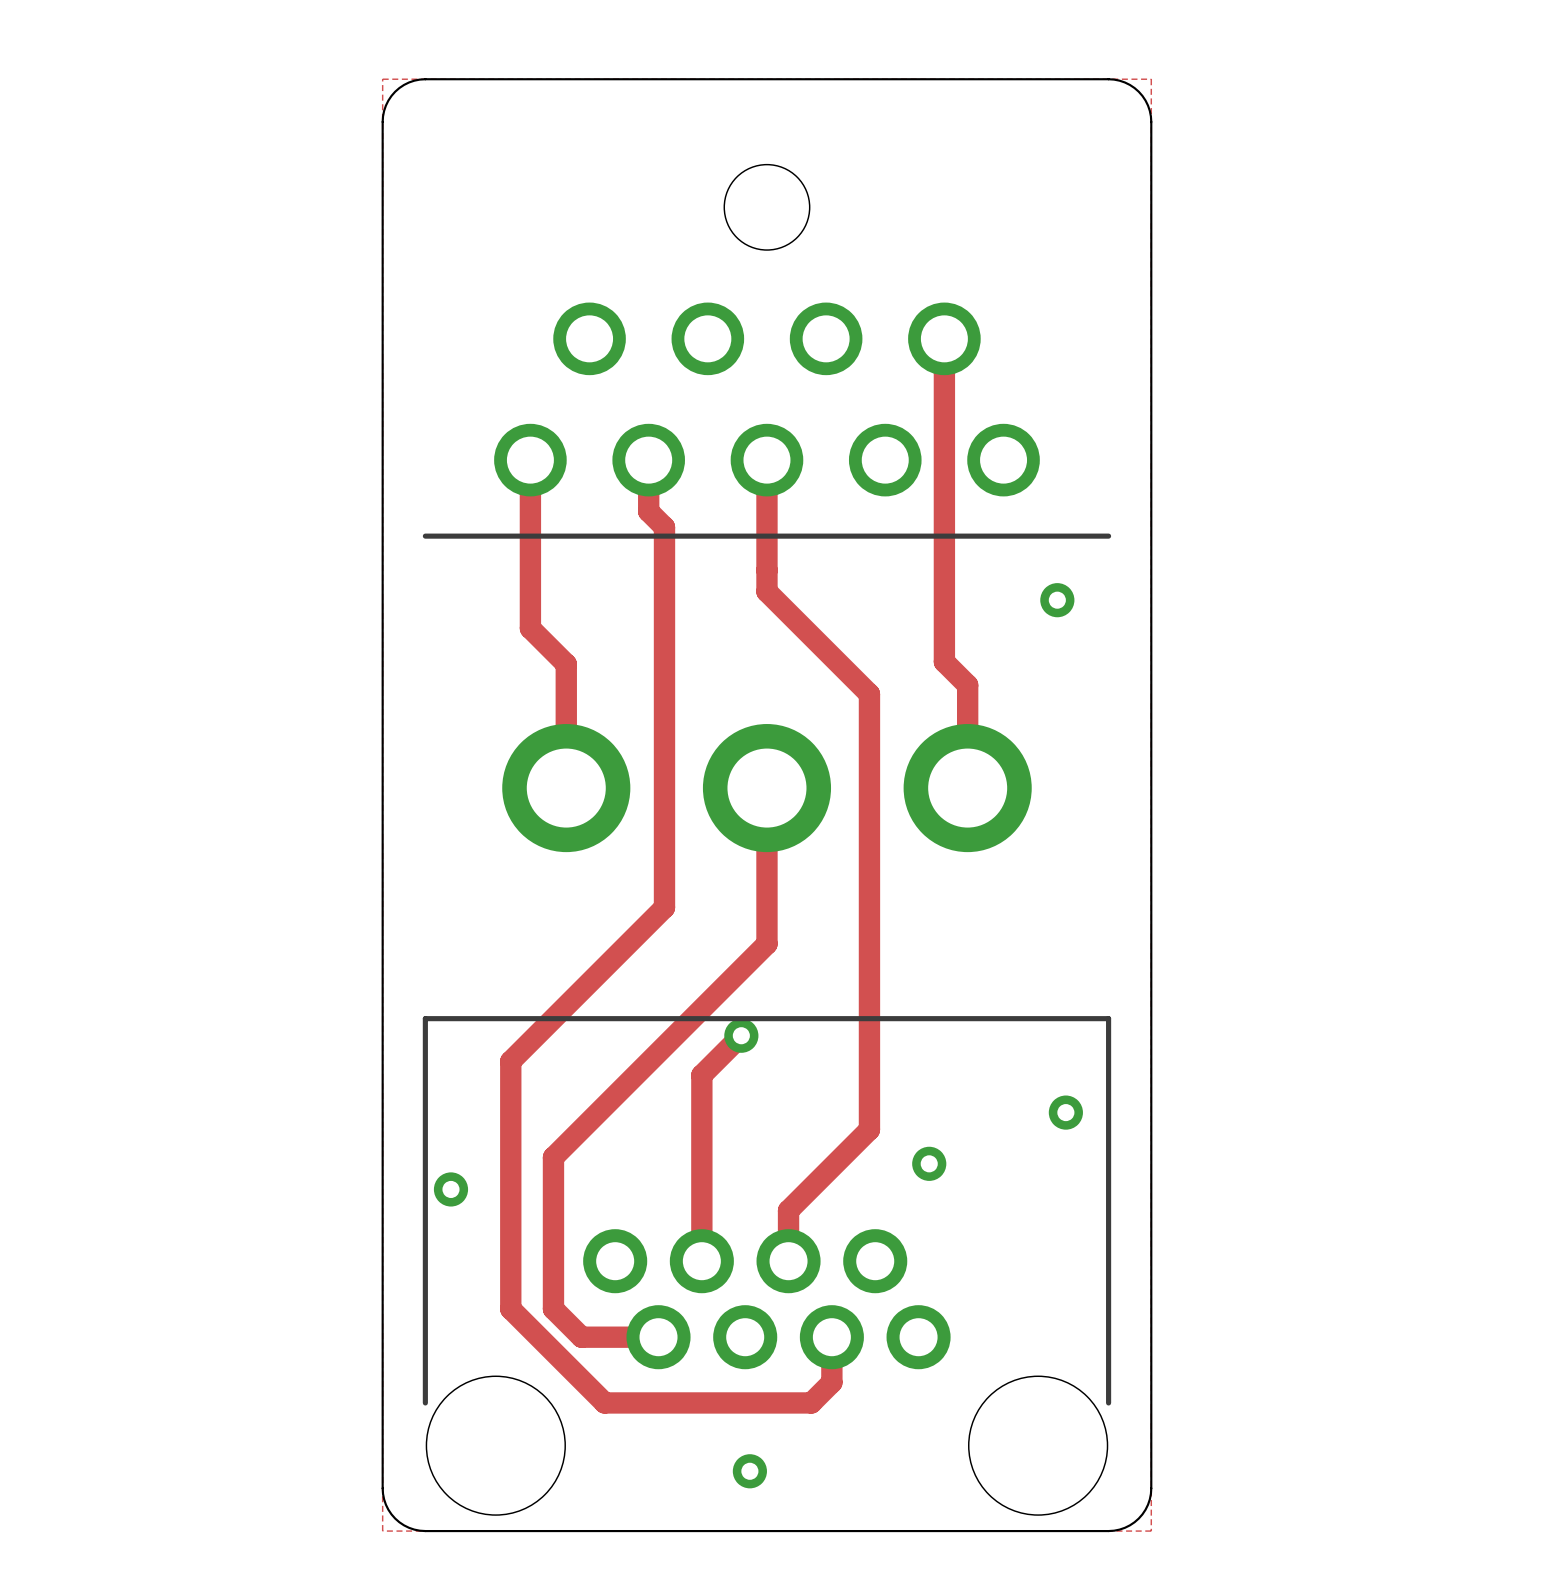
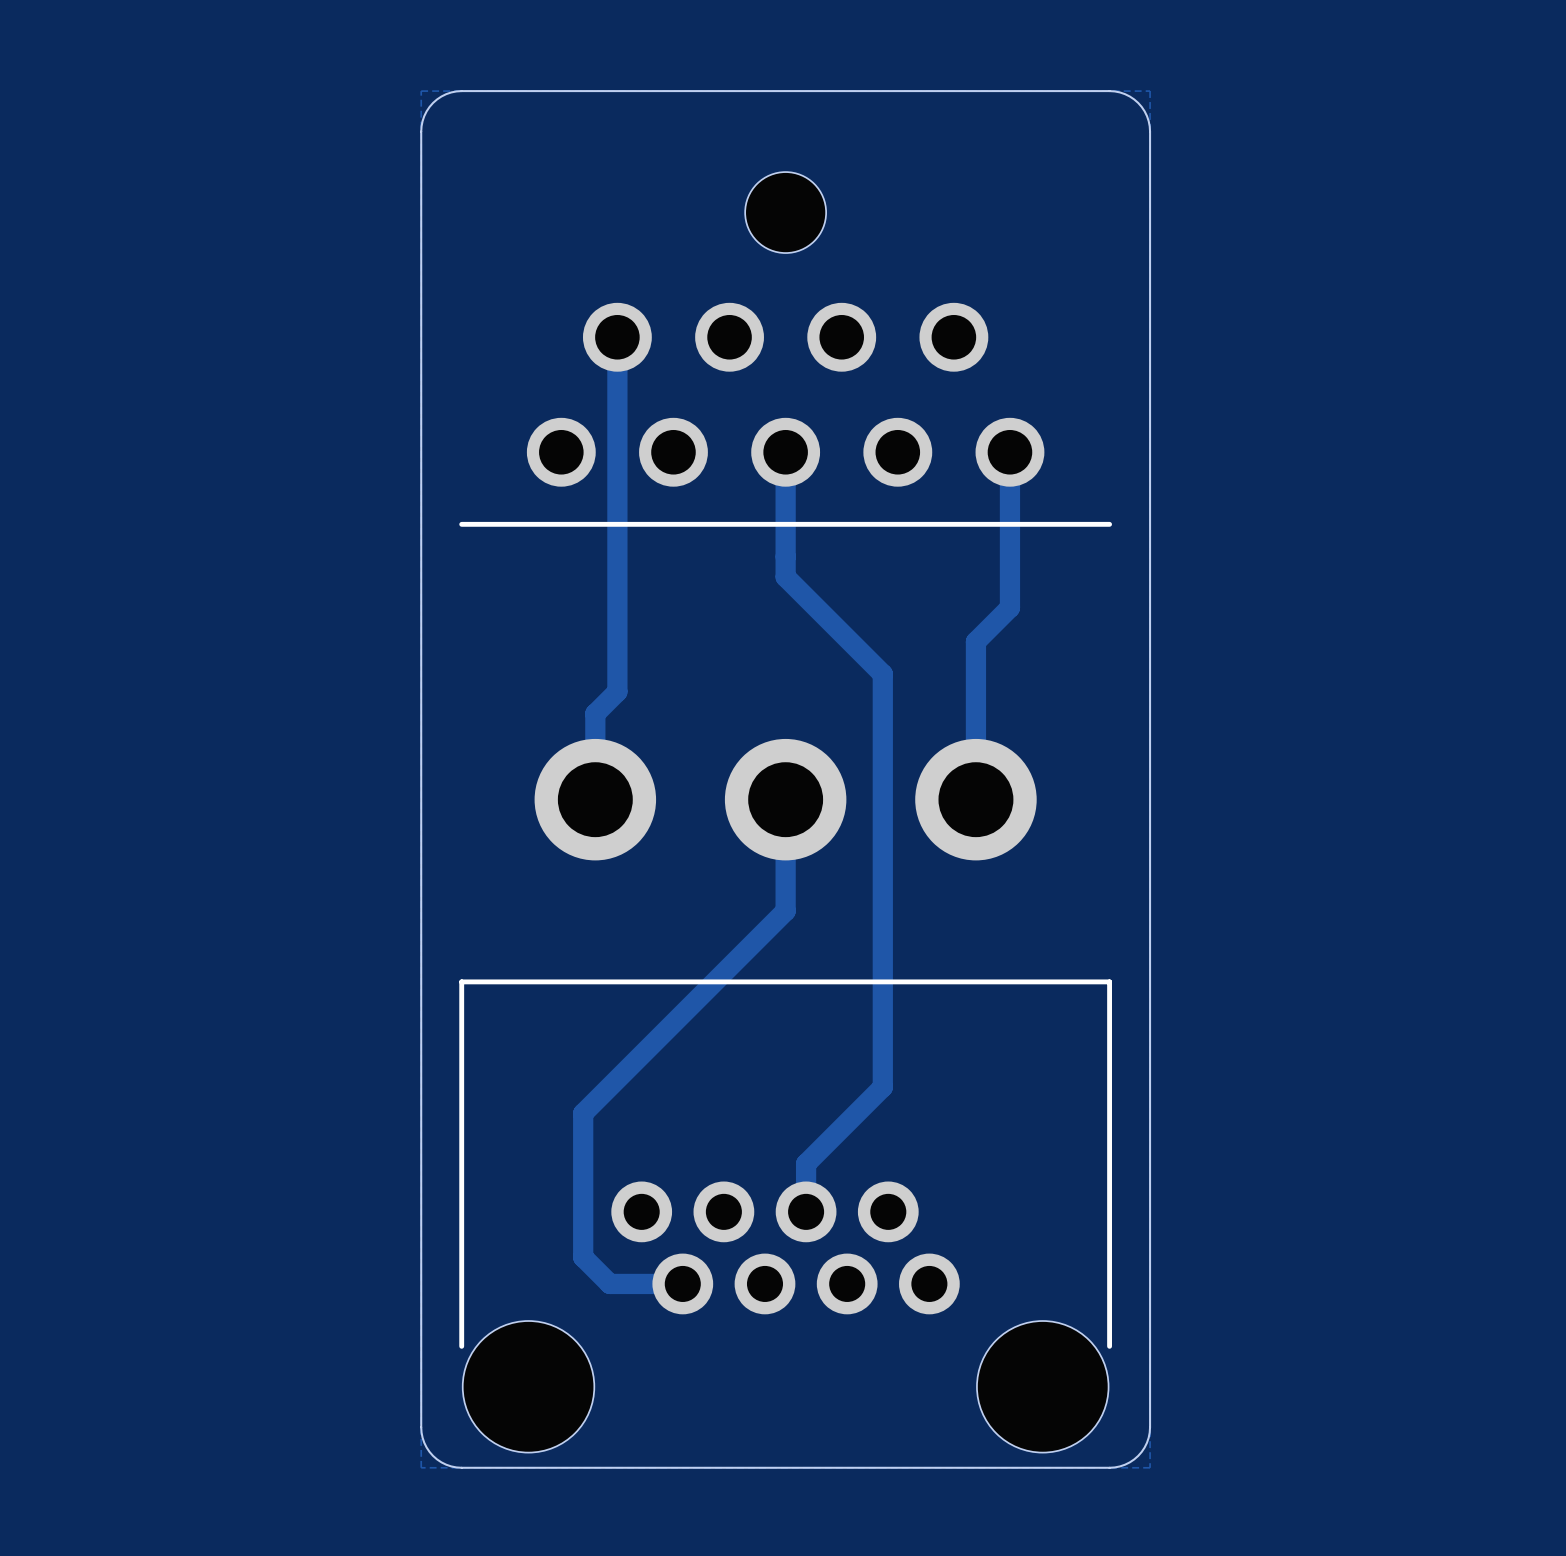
track: (944, 338) (944, 661) (967, 685) -> (1009, 452) (1009, 607) (975, 641) (975, 665)
track: (530, 460) (530, 628) (566, 664) (566, 735) -> (617, 337) (617, 691) (595, 713)
track: (648, 460) (648, 511) (664, 527) (664, 907) (510, 1061) (510, 1309) (604, 1402) (811, 1402) (831, 1382) (831, 1337) -> none
via: (1057, 600) -> none
part position: (766, 788) -> (785, 799)
track: (741, 1035) (701, 1075) (701, 1261) -> none
via: (741, 1035) -> none
via: (1065, 1112) -> none
via: (929, 1163) -> none
via: (450, 1189) -> none
via: (749, 1471) -> none

